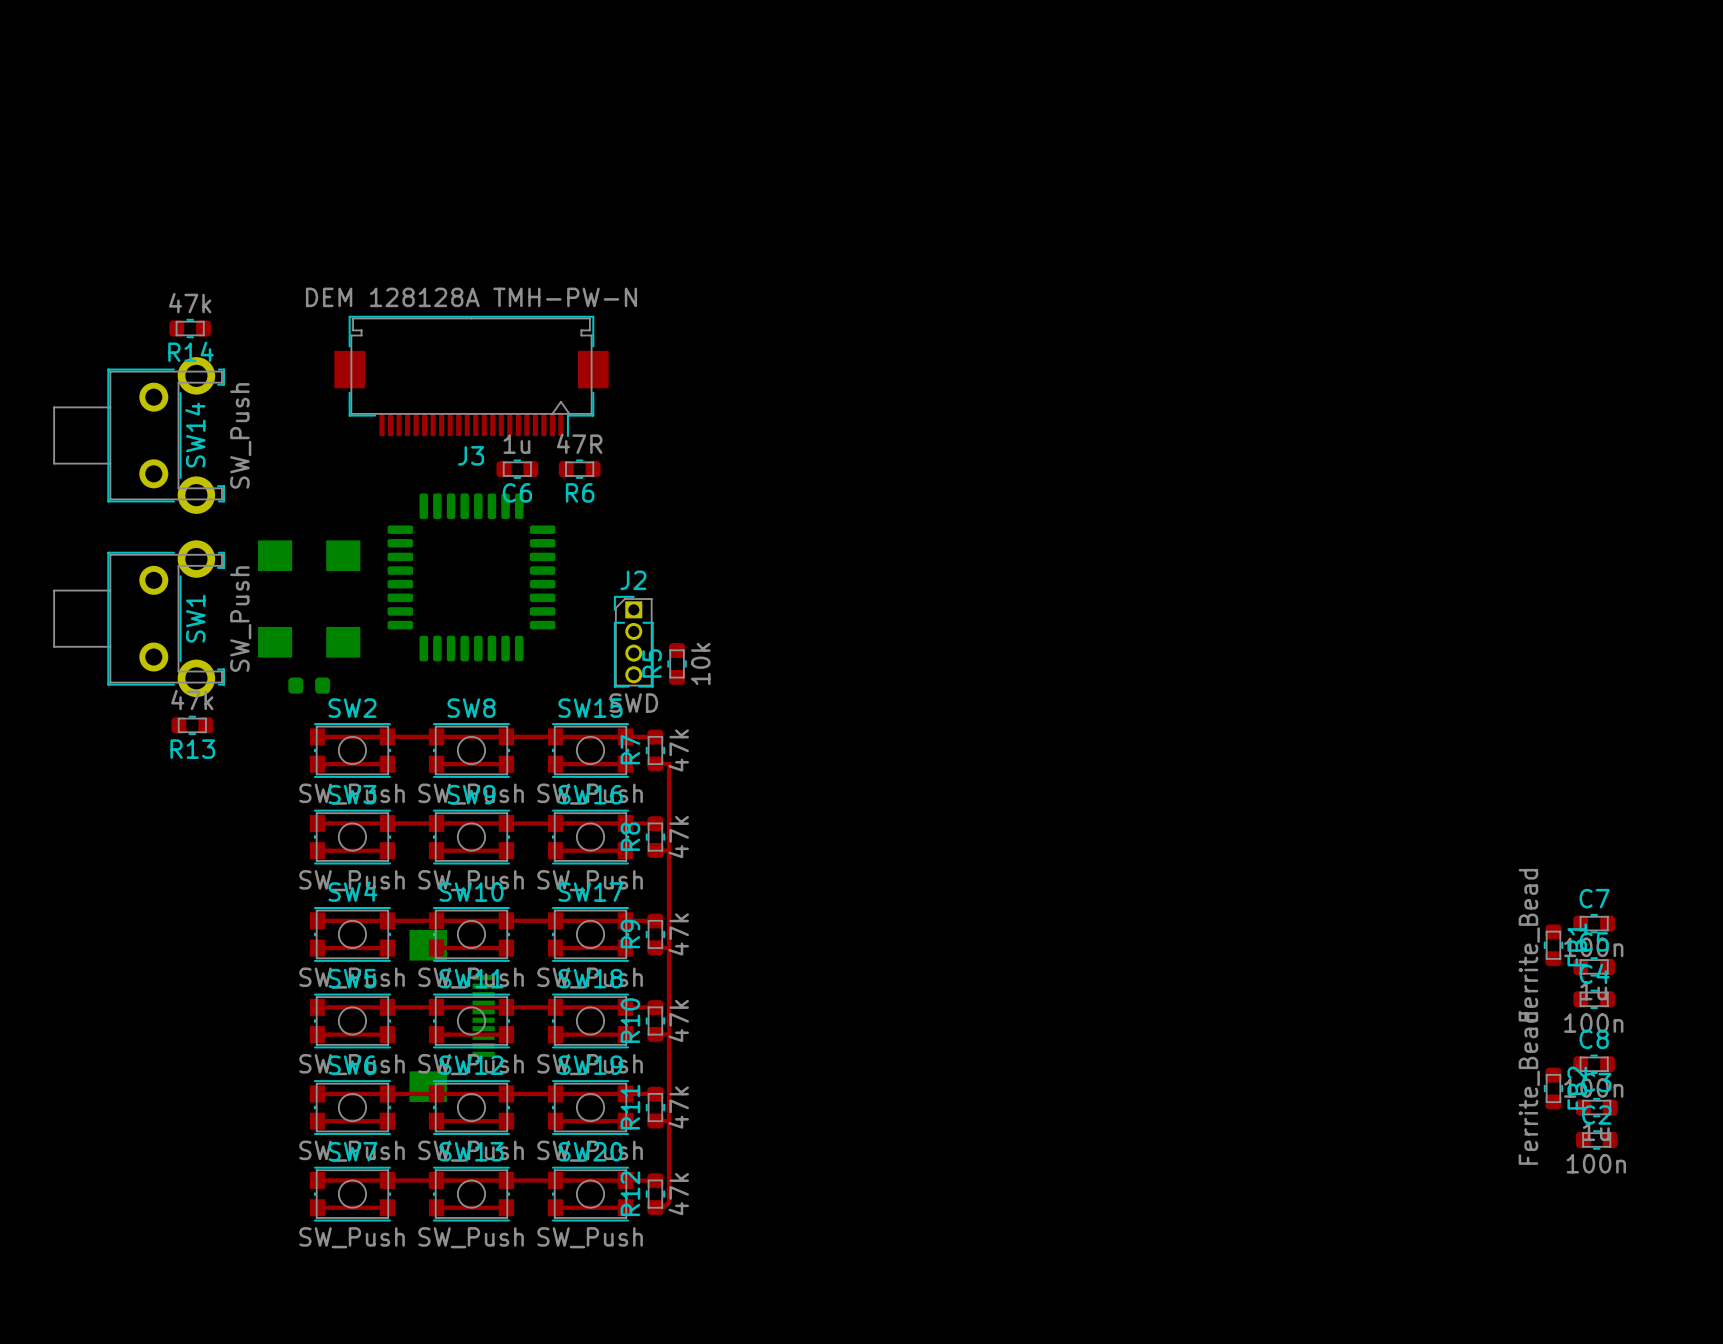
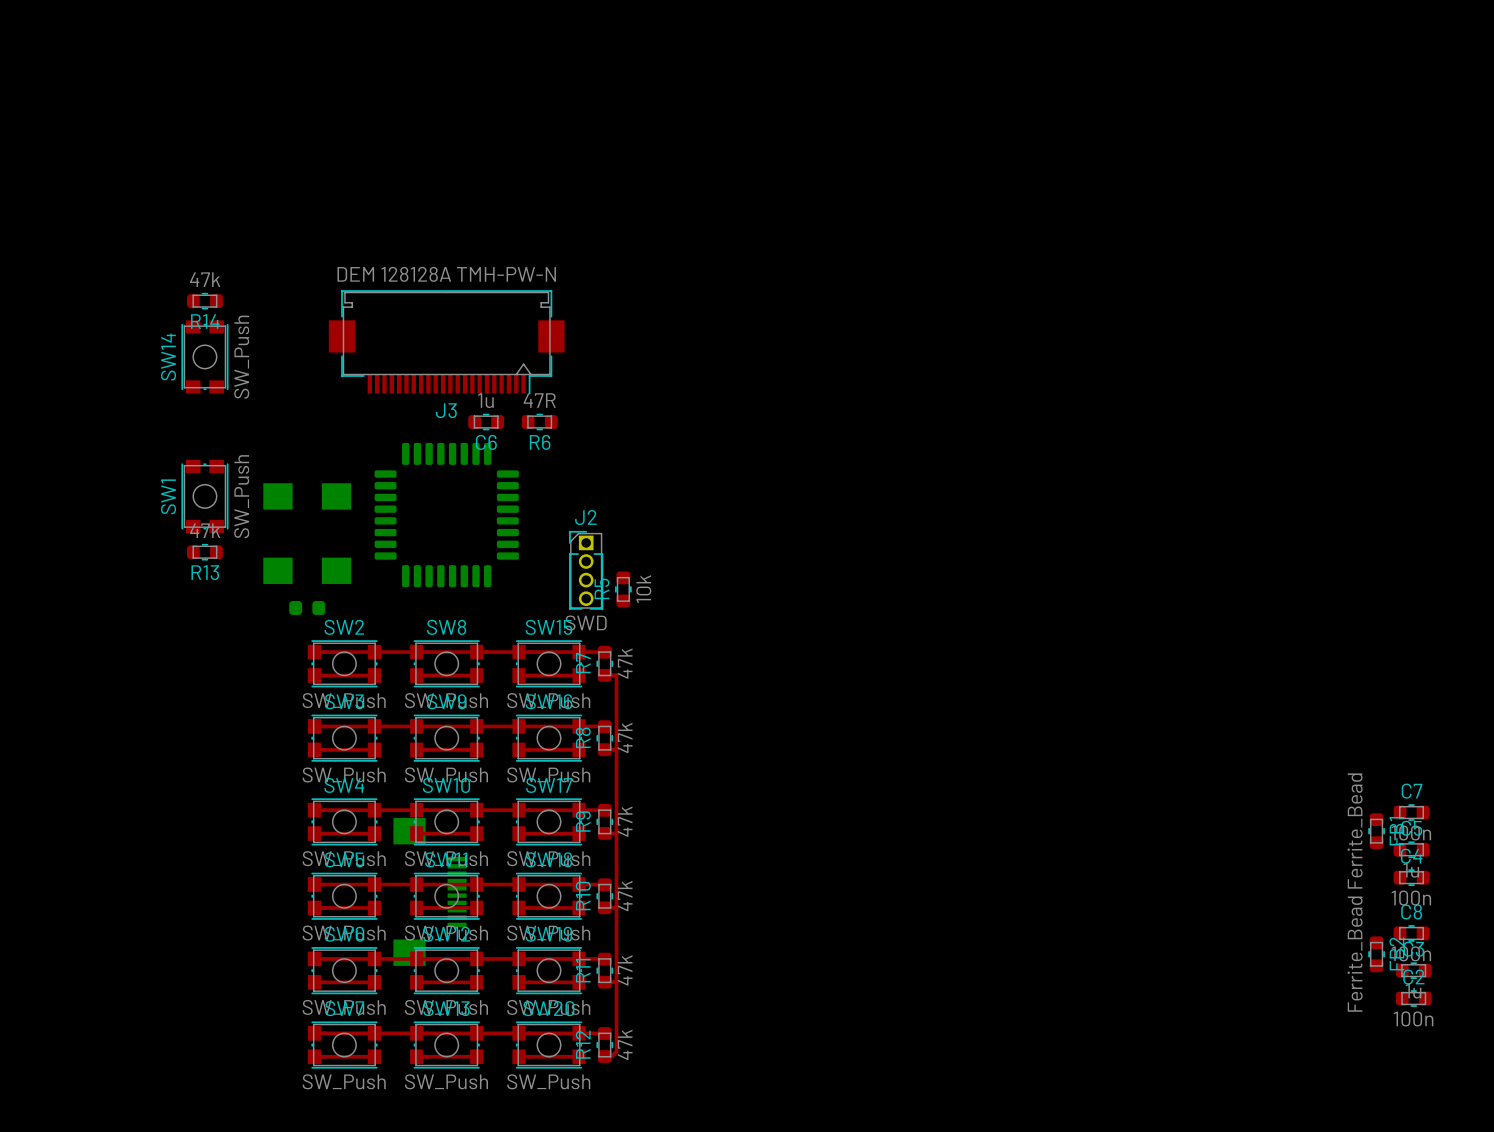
SW14 footprint: [53, 357, 226, 514] -> [181, 320, 229, 394]
SW14 name position: SW14 (195, 435) -> SW14 (168, 357)
SW14 value position: SW_Push (240, 435) -> SW_Push (241, 357)
SW1 footprint: [53, 540, 226, 698] -> [181, 459, 229, 534]
SW1 name position: SW1 (195, 618) -> SW1 (168, 496)
SW1 value position: SW_Push (240, 619) -> SW_Push (241, 496)
R13 position: (192, 725) -> (204, 552)

